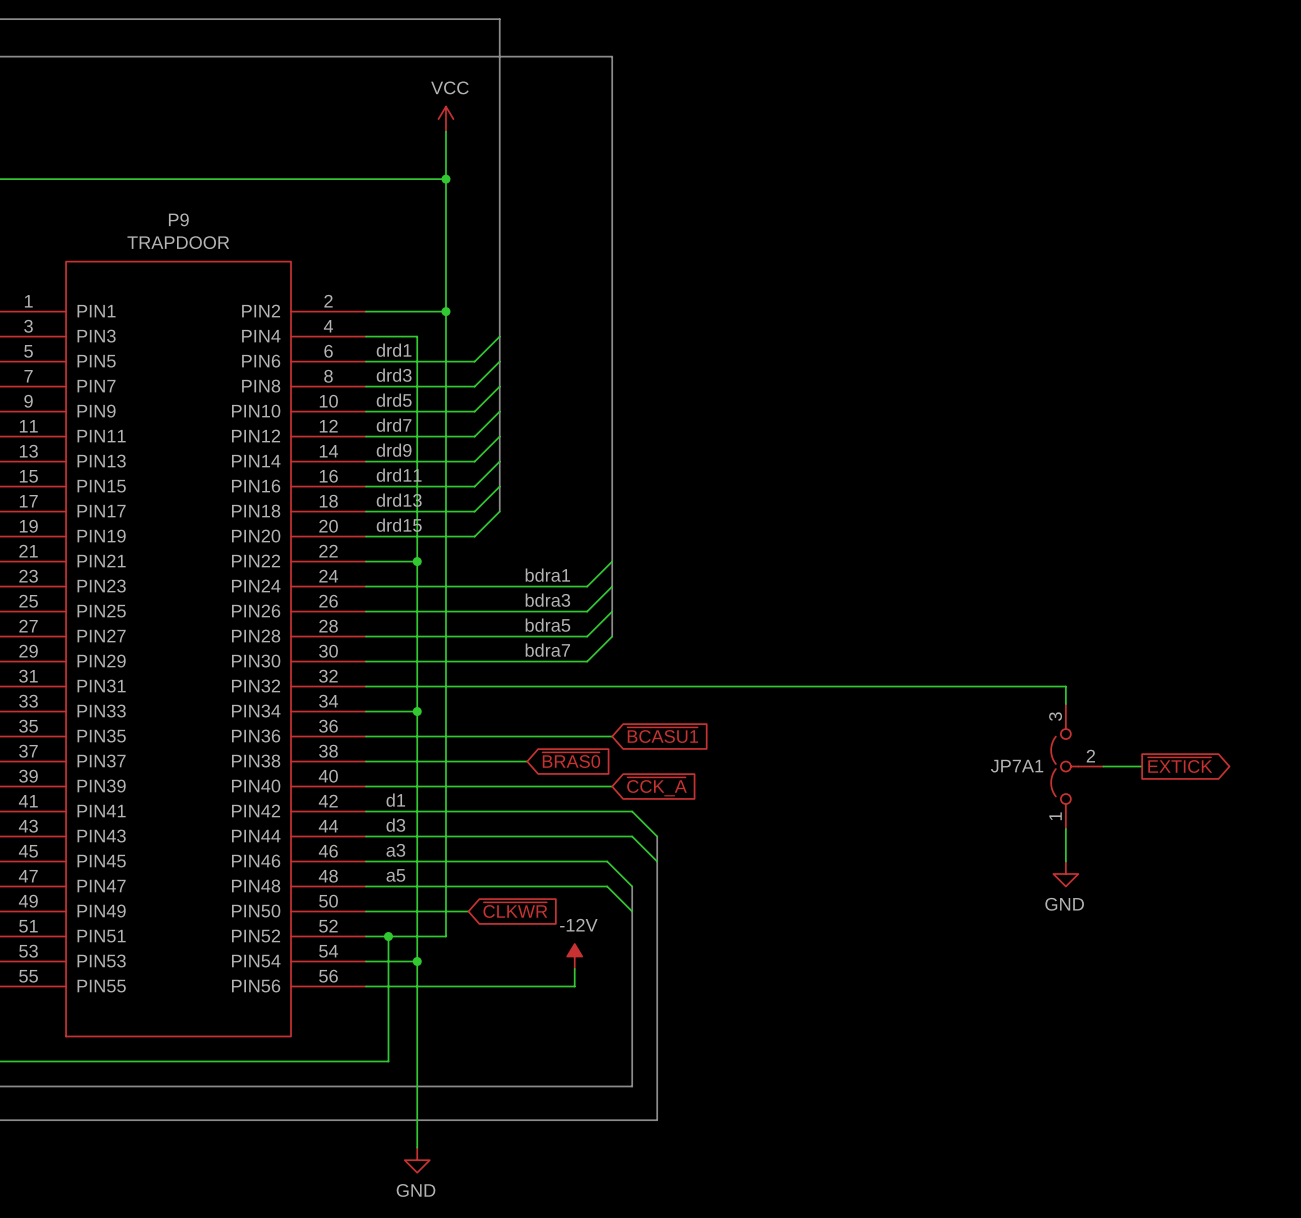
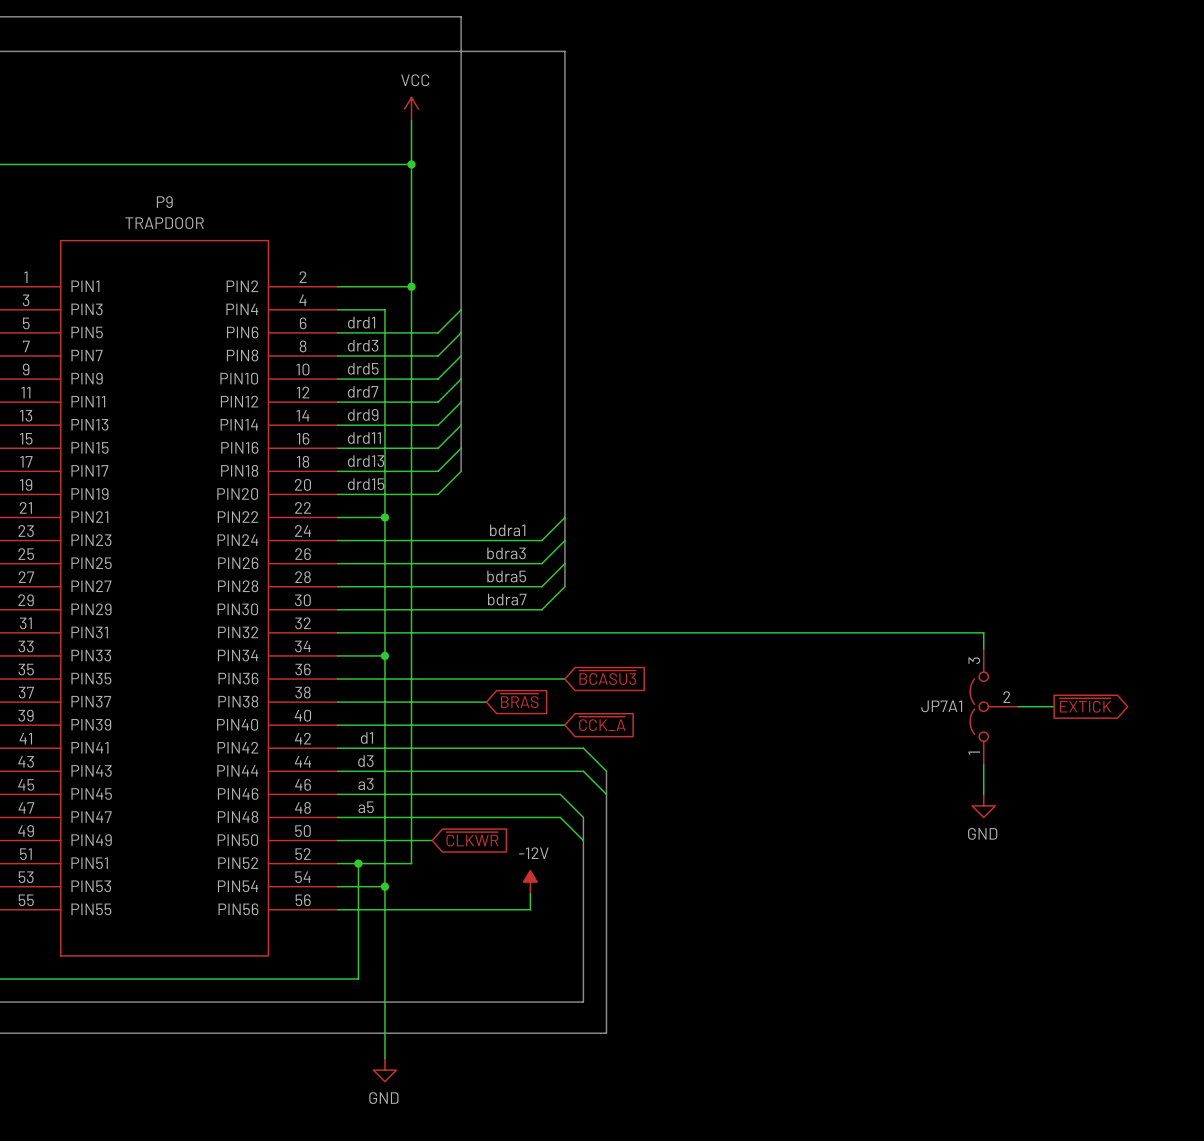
global label: ~{BCASU1} (662, 735) -> ~{BCASU3} (607, 677)
global label: ~{BRAS0} (571, 760) -> ~{BRAS} (519, 700)

